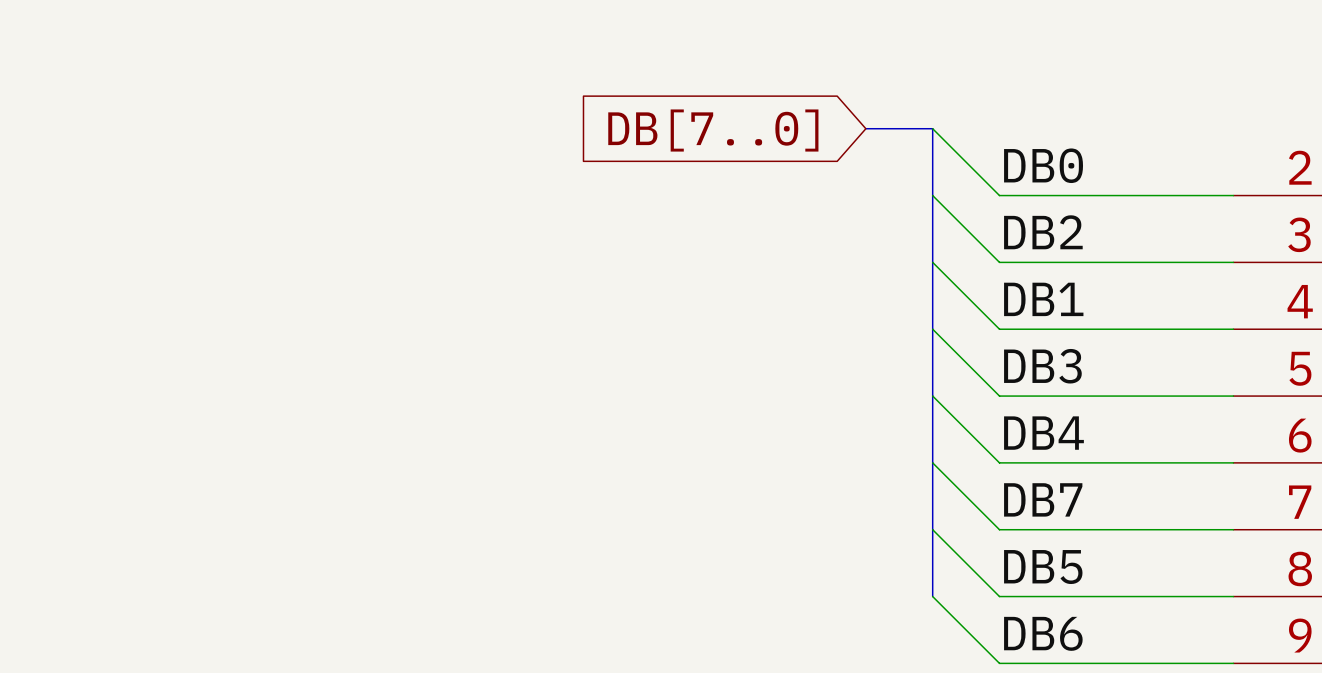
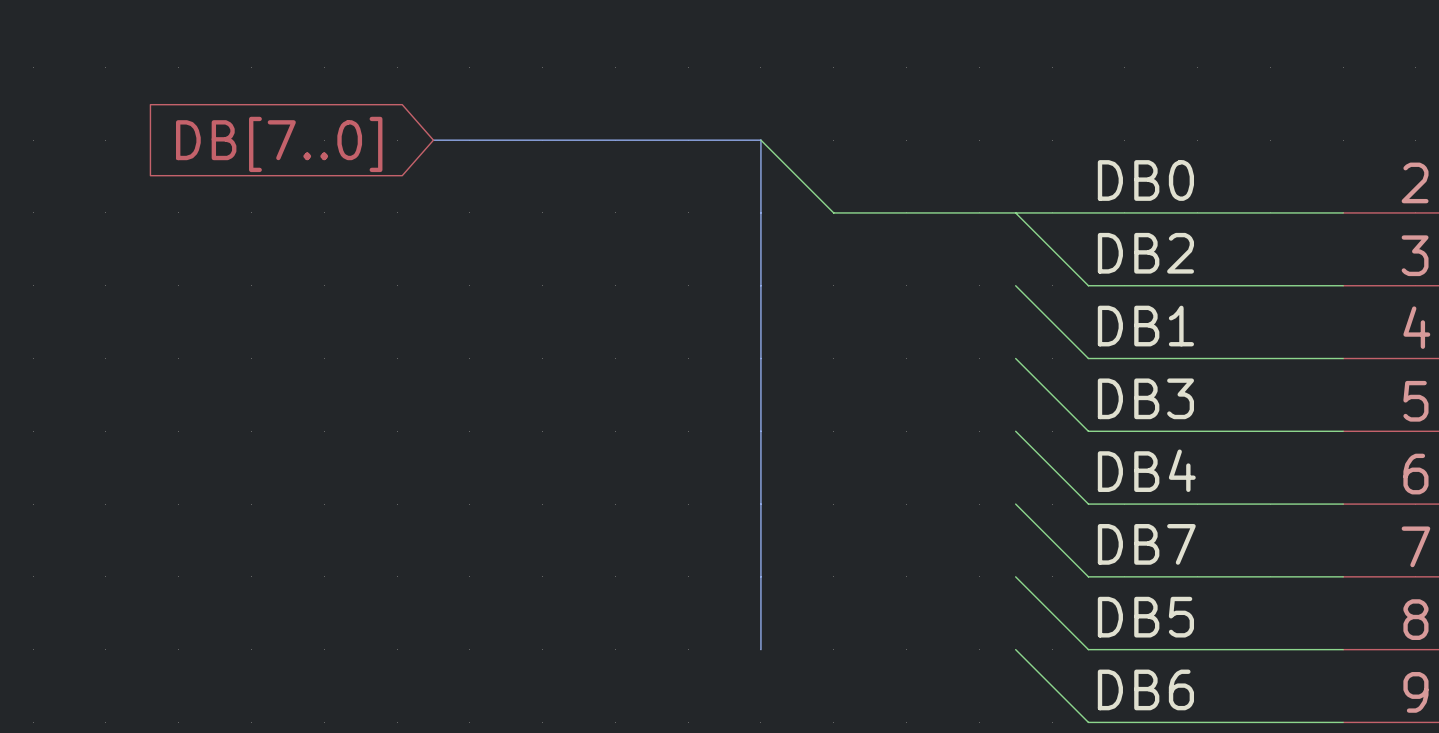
bus: none -> (433, 140) (760, 140) (760, 649)
bus: (865, 128) (932, 128) (932, 596) -> none
wire: (932, 128) (999, 195) -> (760, 140) (833, 212) (1088, 212)
global label position: DB[7..0] (713, 130) -> DB[7..0] (279, 144)

